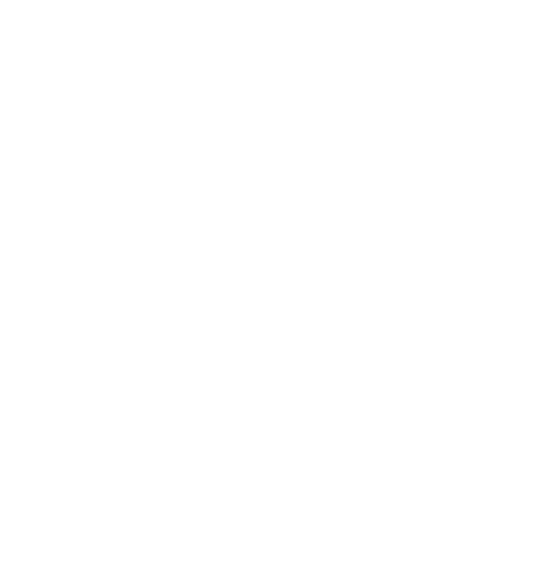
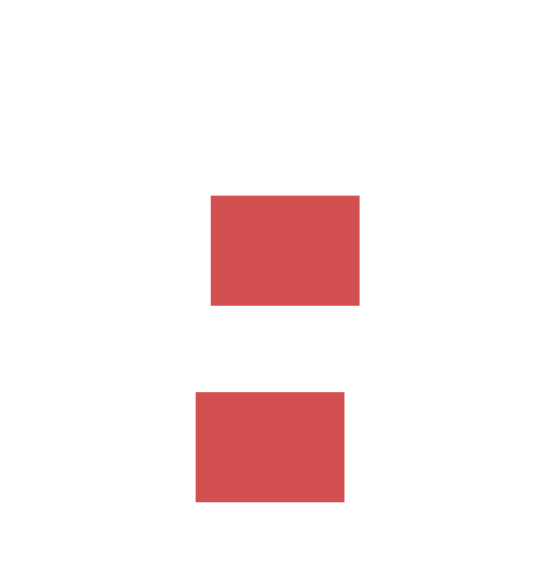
part: none -> (285, 250)
part: none -> (270, 447)

